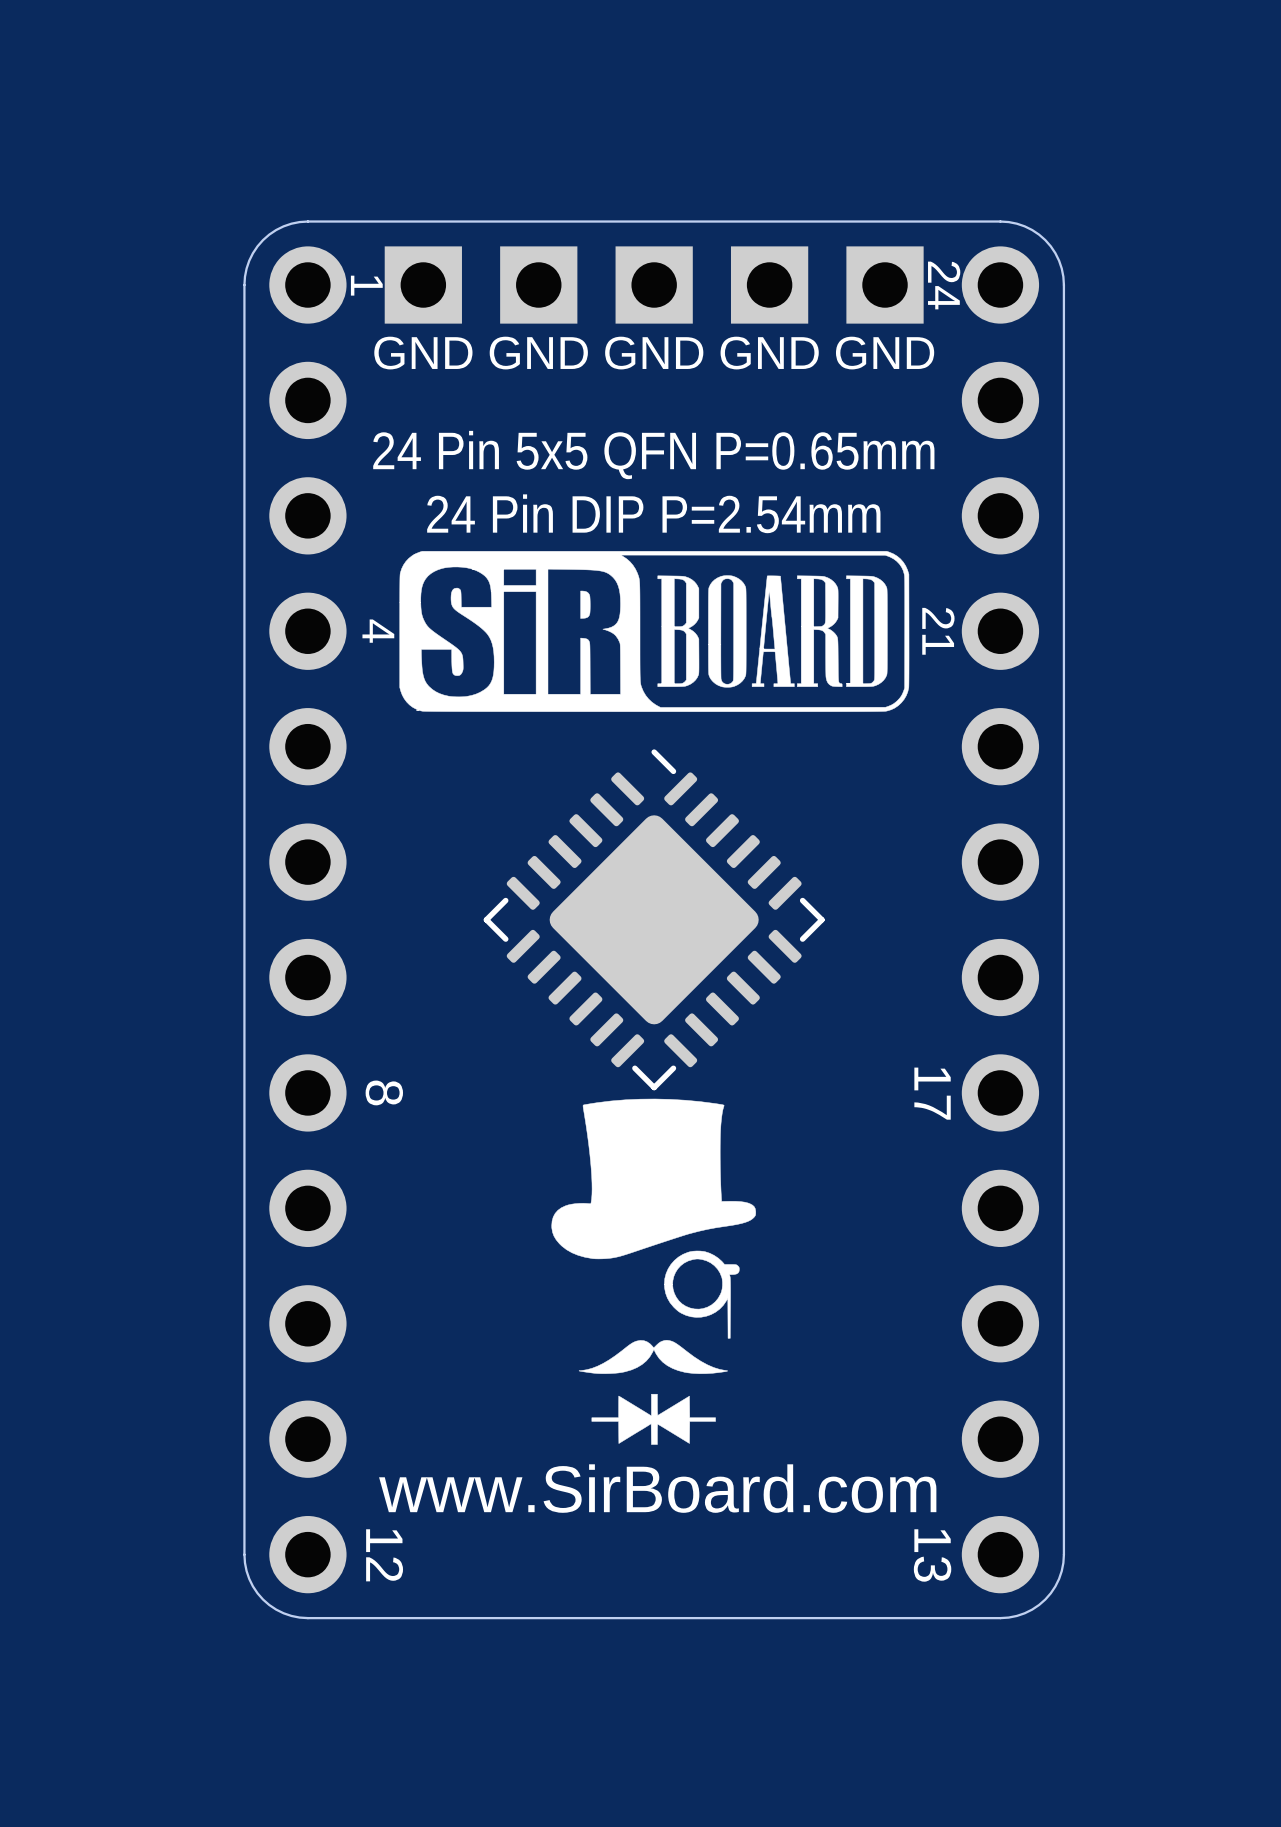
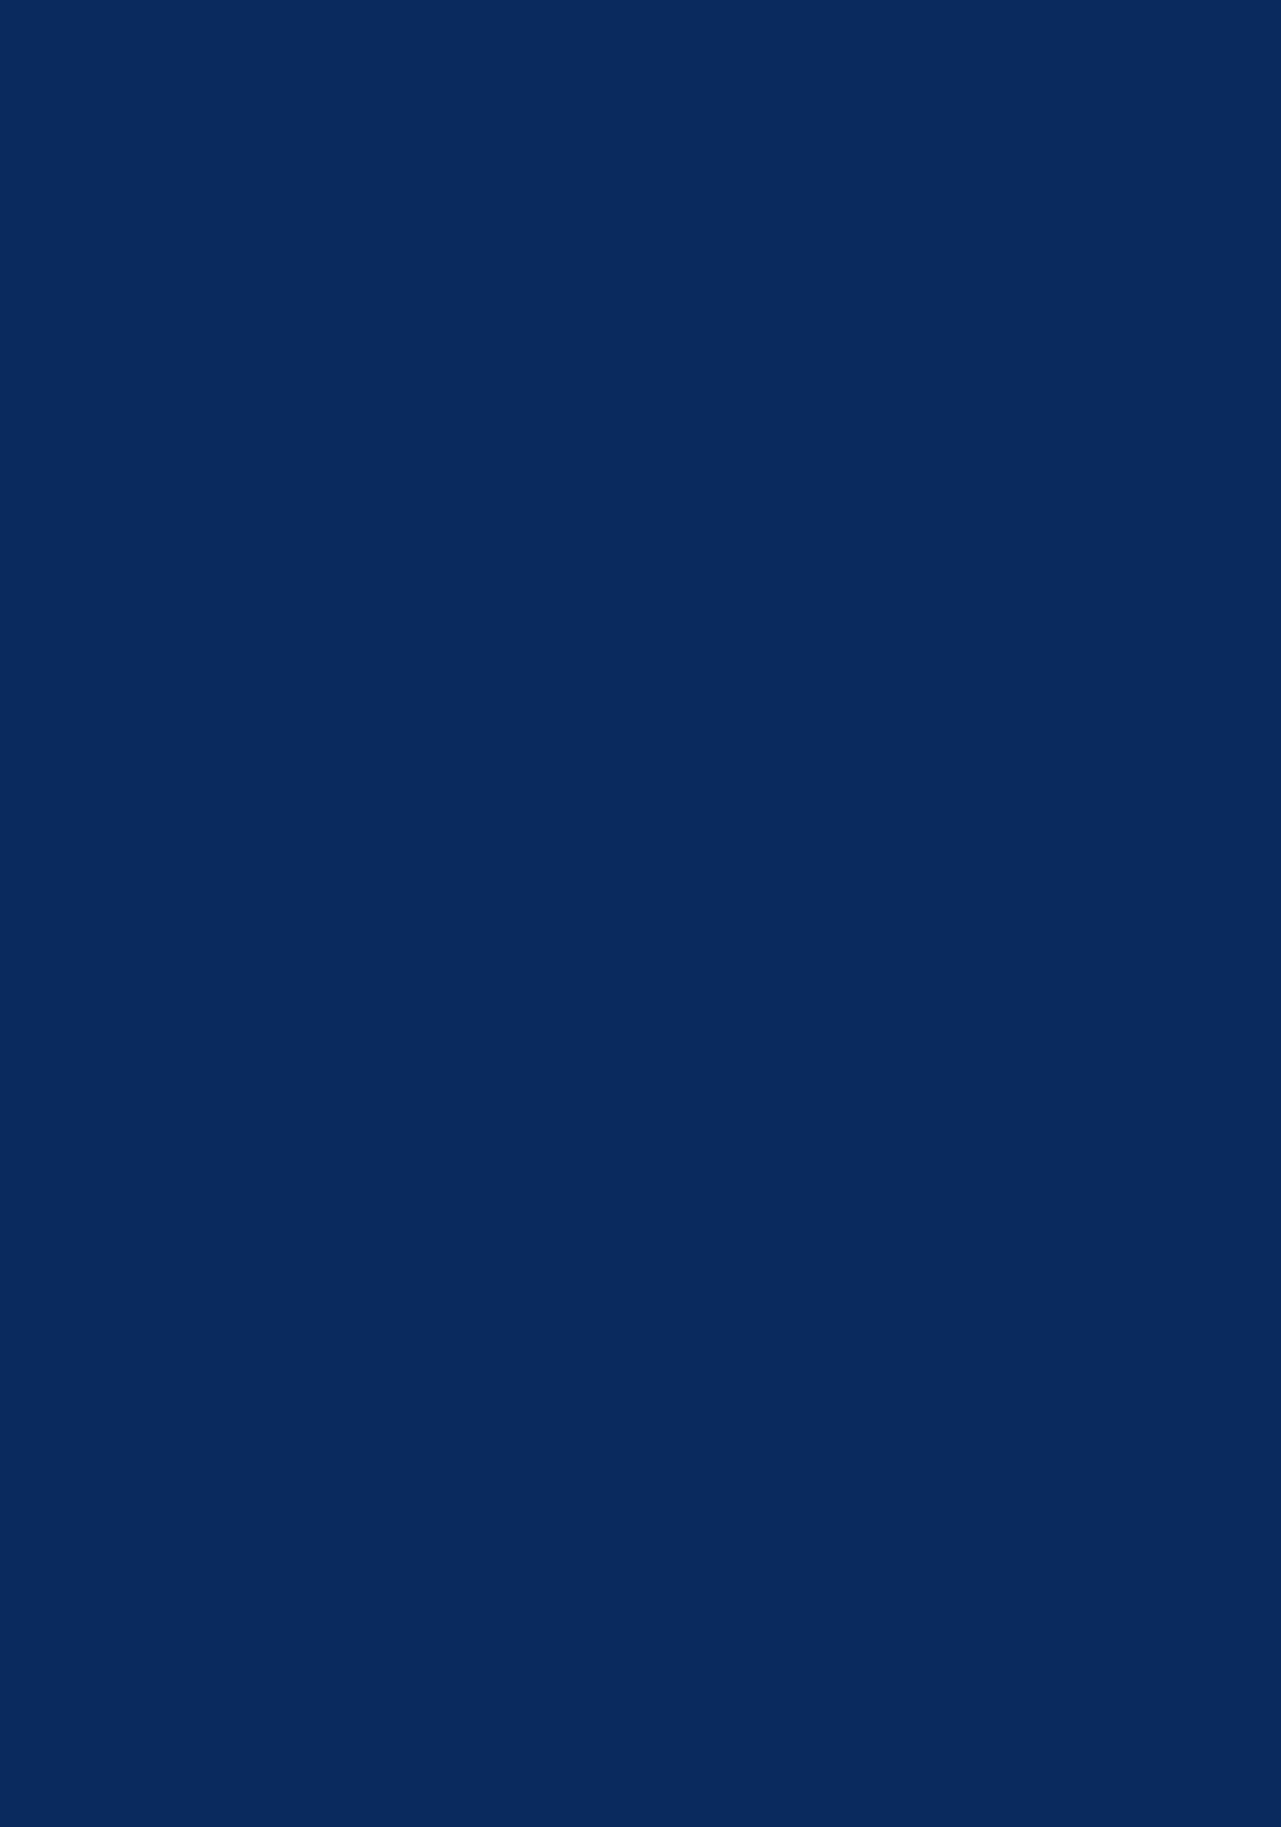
board edge: (1000, 221) (307, 221) (291, 223) (276, 230) (263, 240) (252, 253) (246, 268) (244, 285) (244, 1554) (246, 1571) (252, 1586) (263, 1599) (276, 1609) (291, 1615) (307, 1618) (1000, 1618) (1016, 1615) (1032, 1609) (1045, 1599) (1055, 1586) (1061, 1571) (1063, 1554) (1063, 285) (1059, 260) (1045, 240) (1024, 226) (1000, 221) -> none
text: 1 (366, 285) -> none
part: (654, 285) -> none
text: 24 (944, 285) -> none
text: GND (423, 353) -> none
text: GND (538, 353) -> none
text: GND (654, 353) -> none
text: GND (769, 353) -> none
text: GND (885, 353) -> none
text: 24 Pin 5x5 QFN P=0.65mm (653, 455) -> none
text: 24 Pin DIP P=2.54mm (653, 513) -> none
drawing: [399, 551, 910, 712] -> none
text: 4 (378, 631) -> none
text: 21 (938, 631) -> none
part: (307, 919) -> none
part: (654, 919) -> none
part: (1000, 919) -> none
text: 8 (384, 1092) -> none
text: 17 (932, 1093) -> none
drawing: [551, 1098, 756, 1445] -> none
text: www.SirBoard.com (657, 1488) -> none
text: 12 (384, 1555) -> none
text: 13 (932, 1555) -> none

